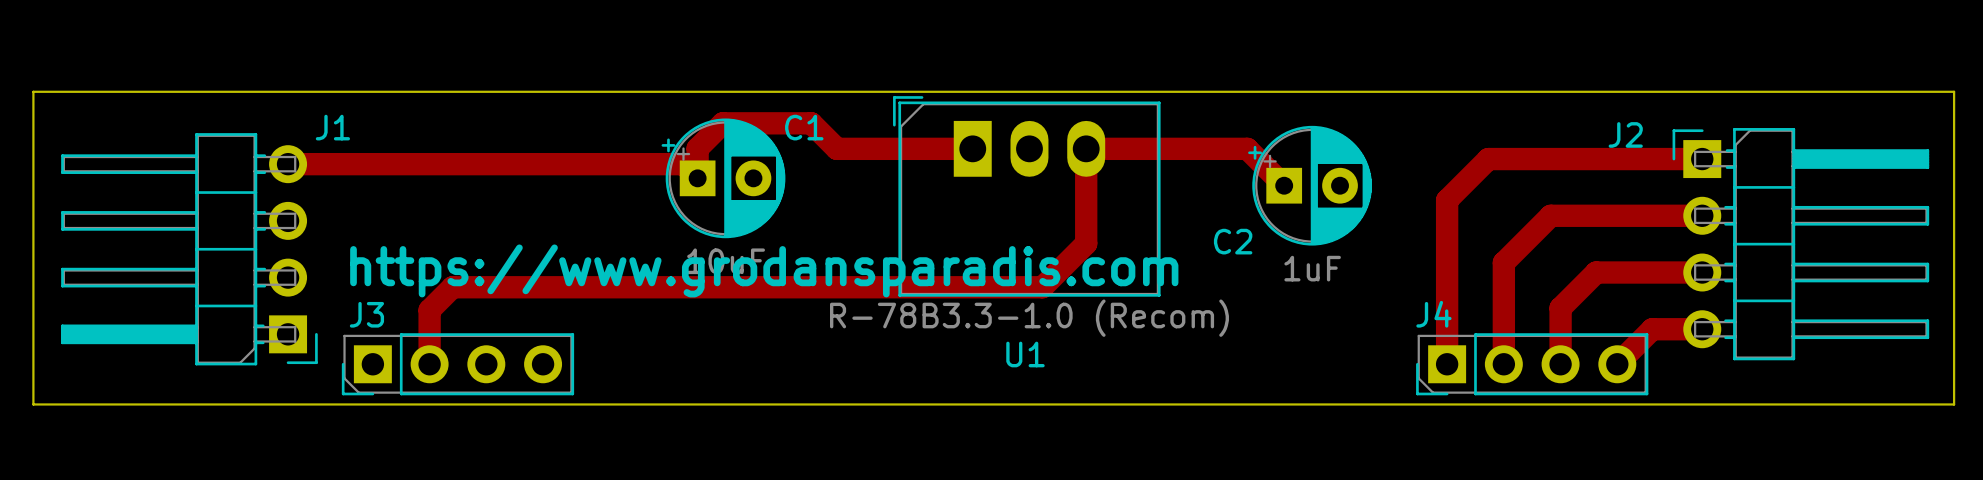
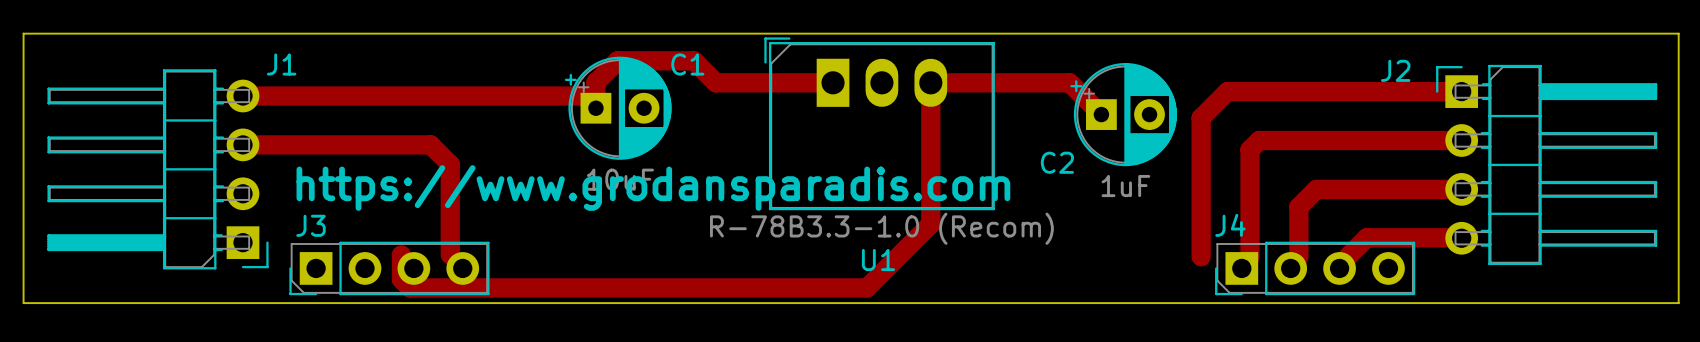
track: (1488, 159) (1447, 200) (1447, 364) -> (1277, 91) (1227, 91) (1201, 118) (1201, 256)
track: (1550, 215) (1503, 262) (1503, 364) -> (1331, 140) (1259, 140) (1250, 149) (1250, 256)
track: none -> (243, 144) (430, 144) (450, 164) (450, 254)
track: (1086, 243) (1042, 287) (452, 287) (429, 310) (429, 364) -> (930, 164) (930, 224) (867, 287) (409, 287) (401, 279) (401, 254)
track: (1596, 272) (1560, 308) (1560, 364) -> (1370, 189) (1316, 189) (1298, 206) (1298, 256)
track: (1702, 329) (1652, 329) (1617, 364) -> (1461, 238) (1366, 237) (1347, 256)

